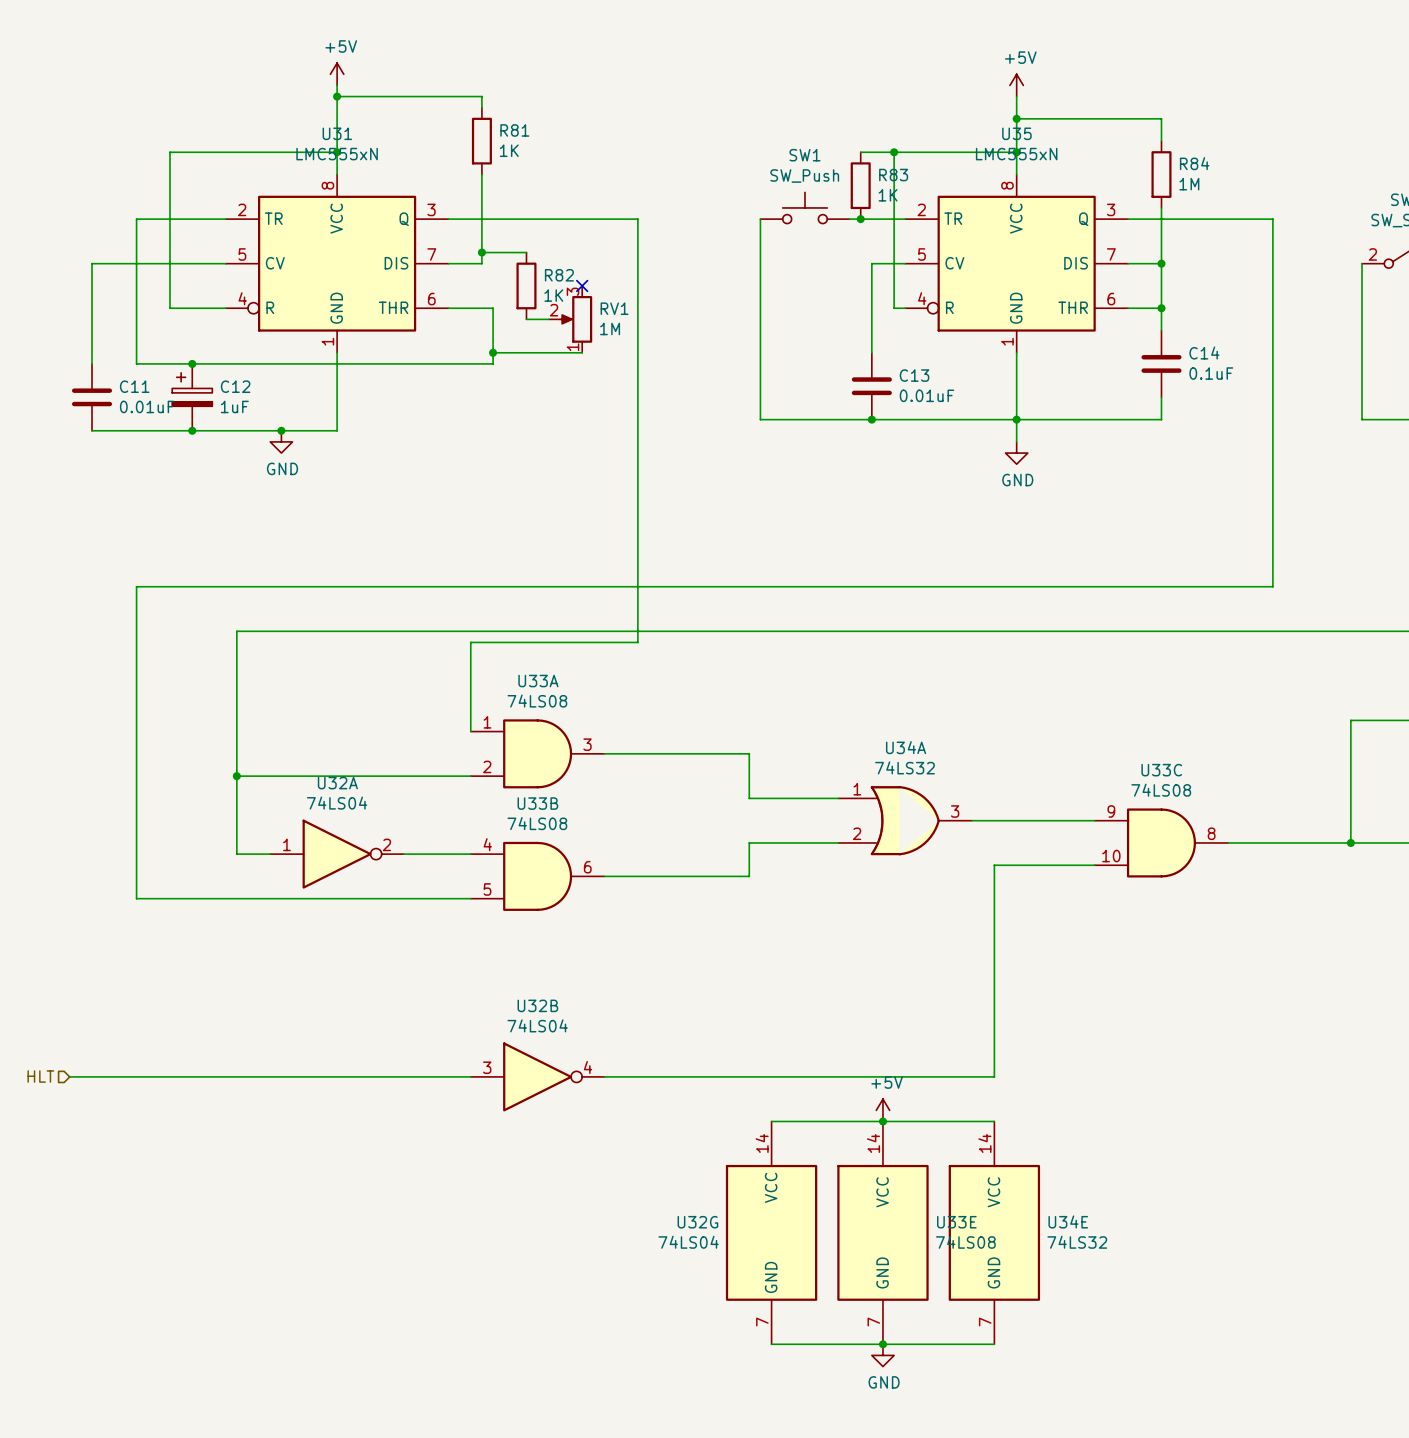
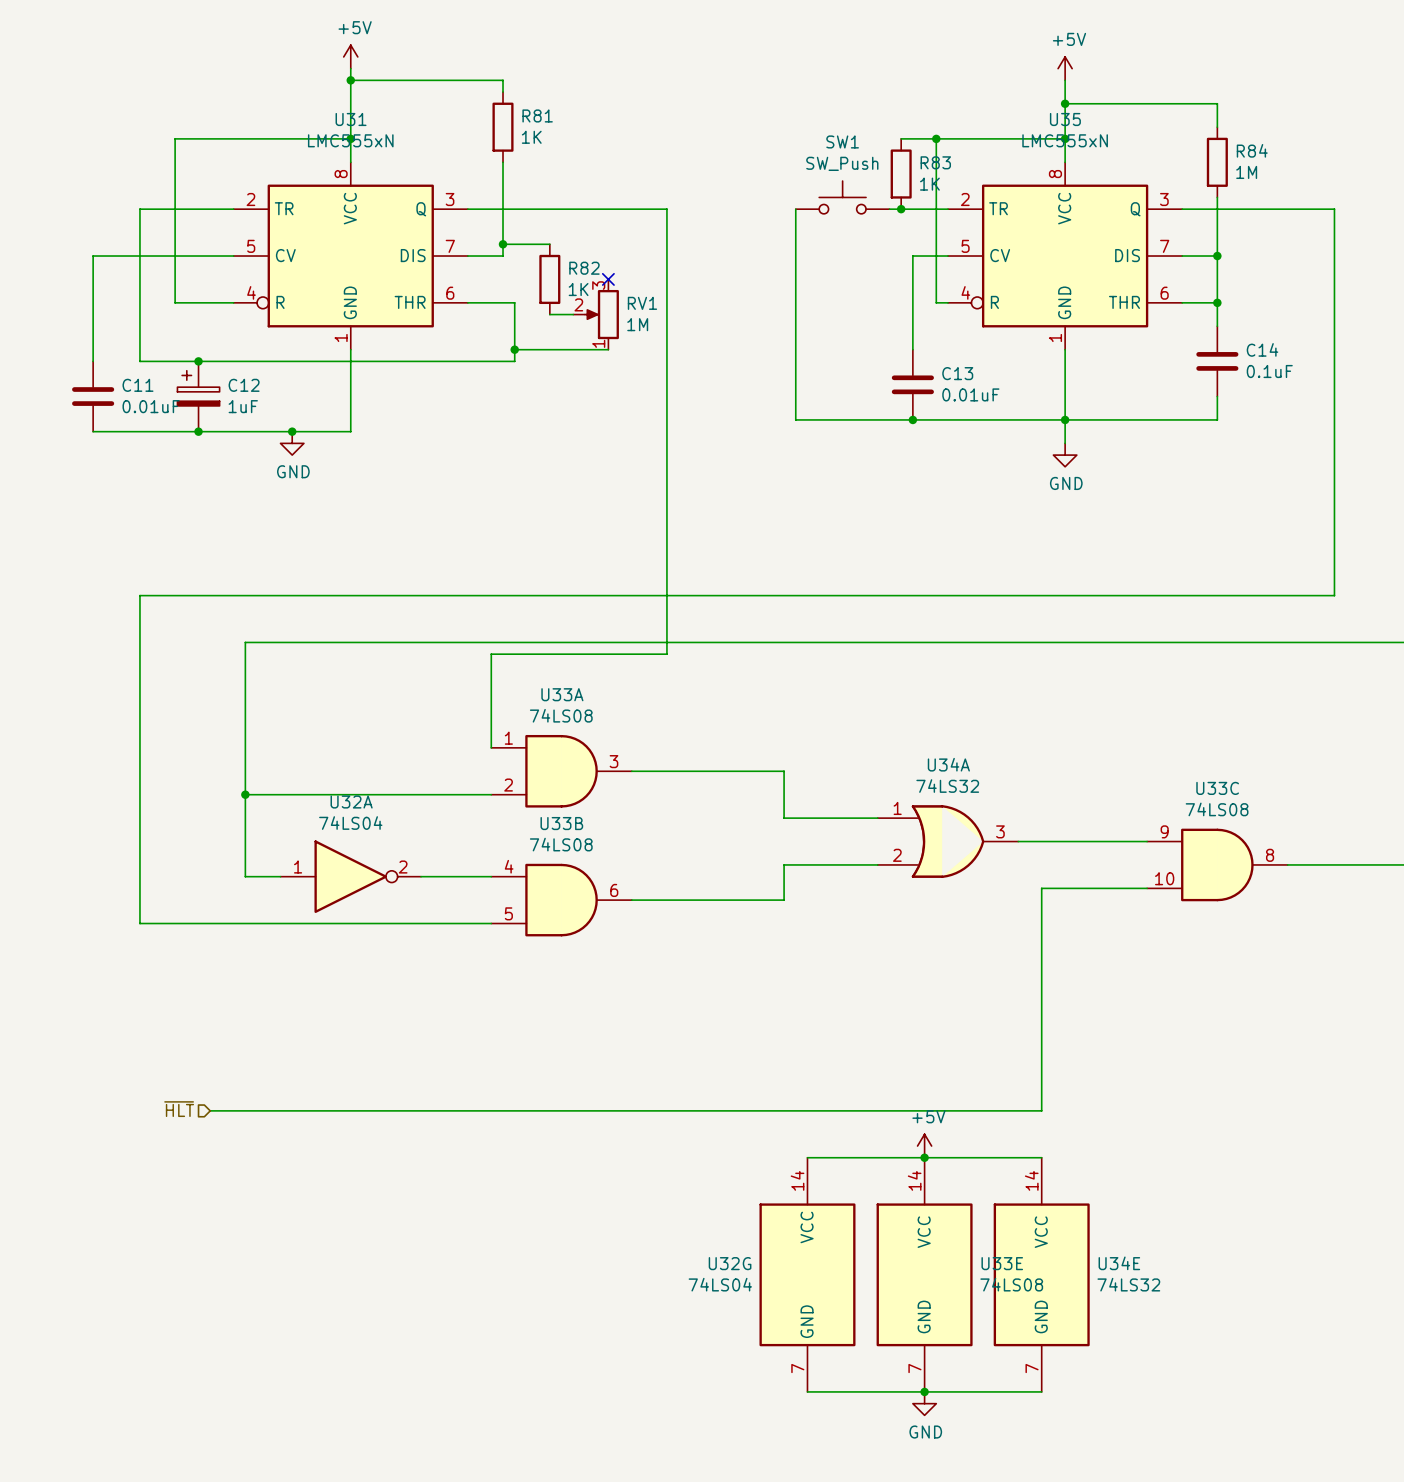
hierarchical label: none -> ~{HLT} (179, 1109)
hierarchical label: HLT (40, 1076) -> none
wire: (69, 1076) (203, 1076) -> none
U32B: 74LS04 (537, 1076) -> none

